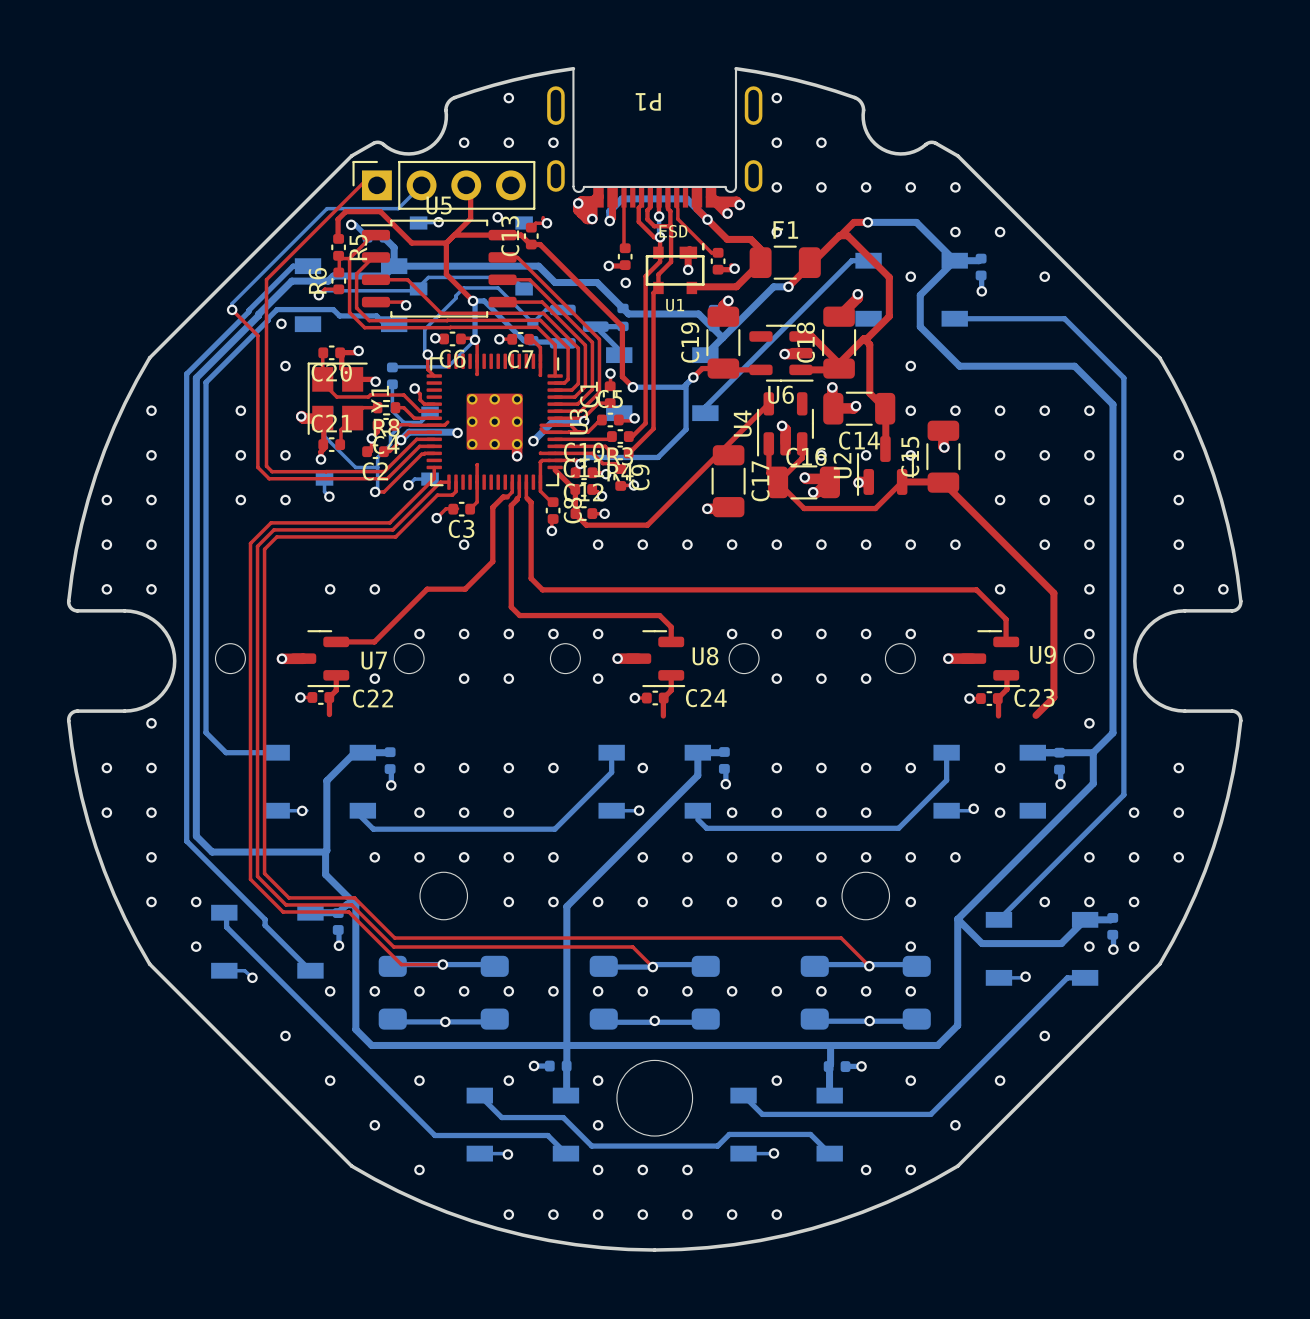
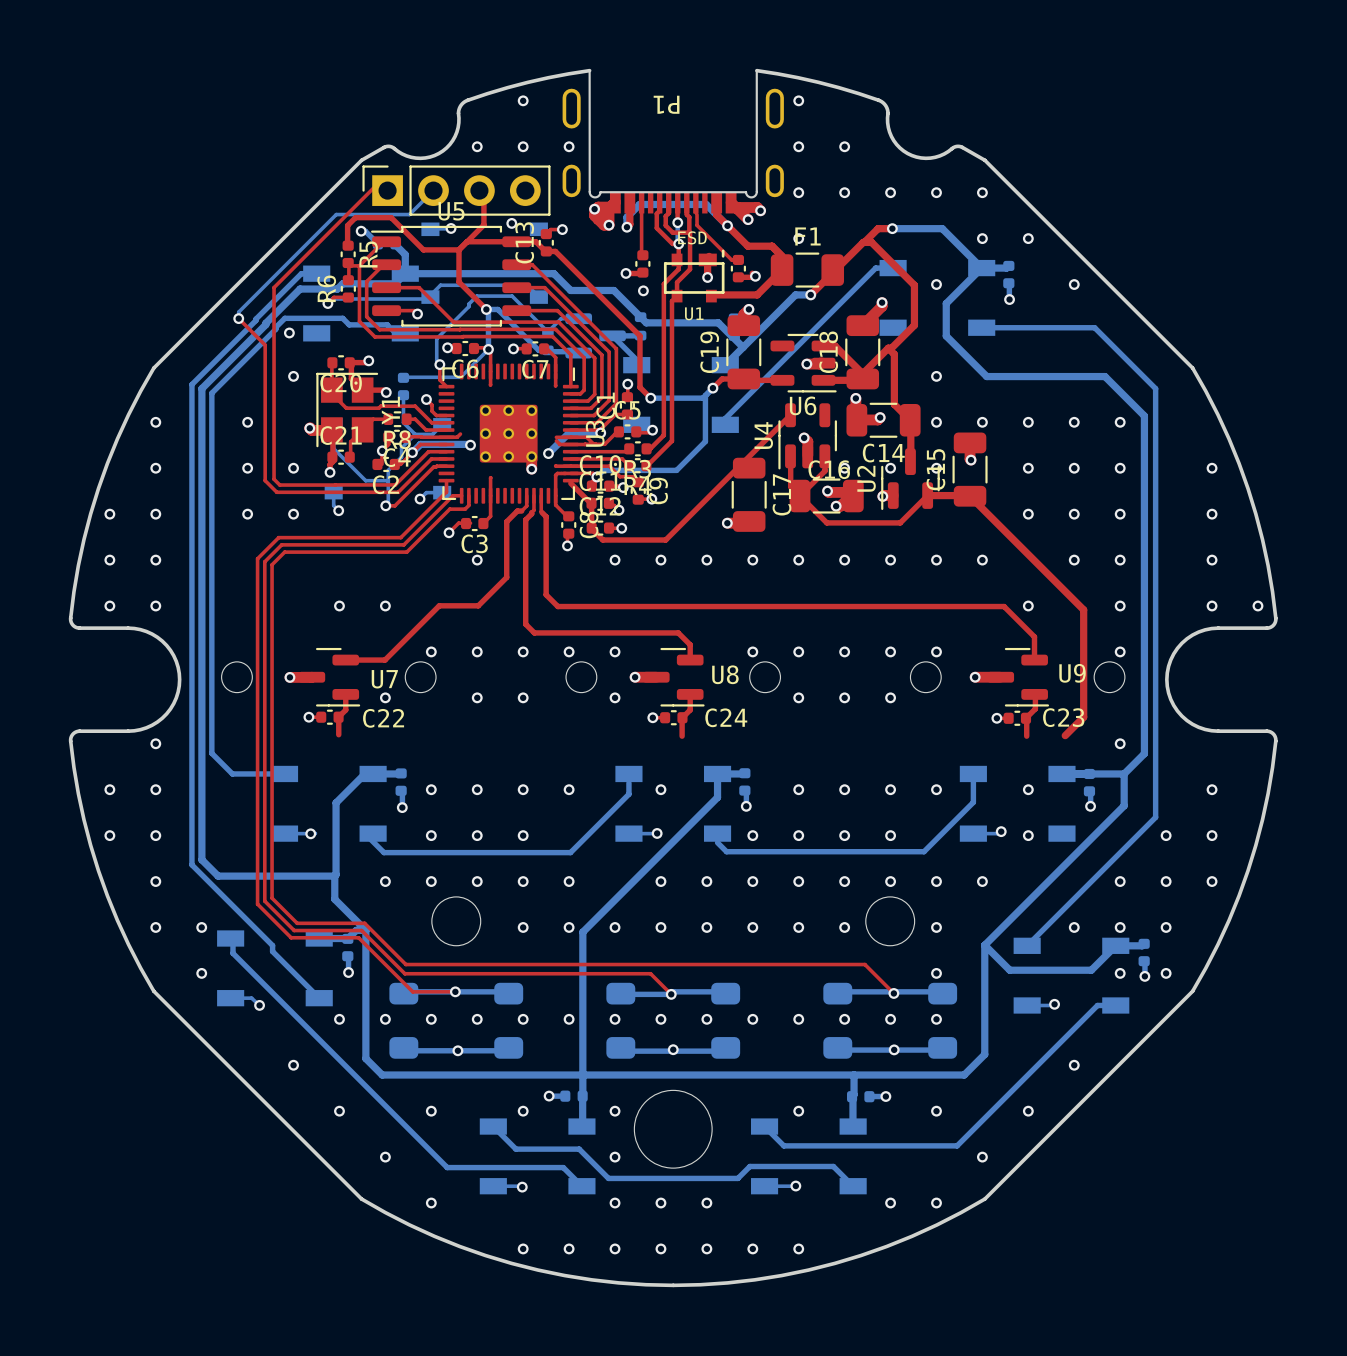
top track: (543, 217) (546, 223) -> none

